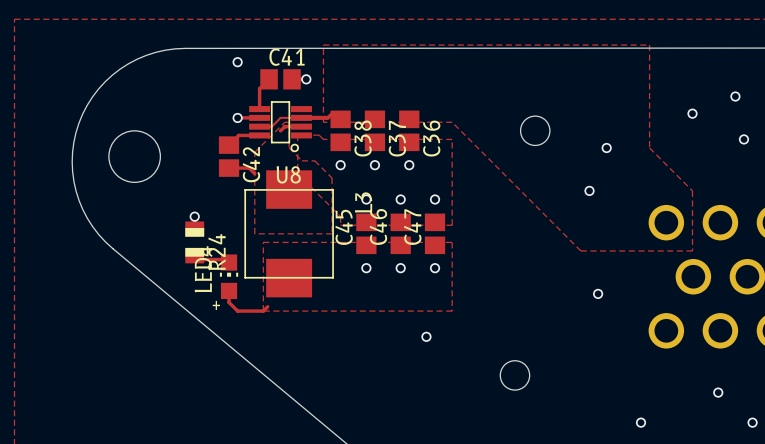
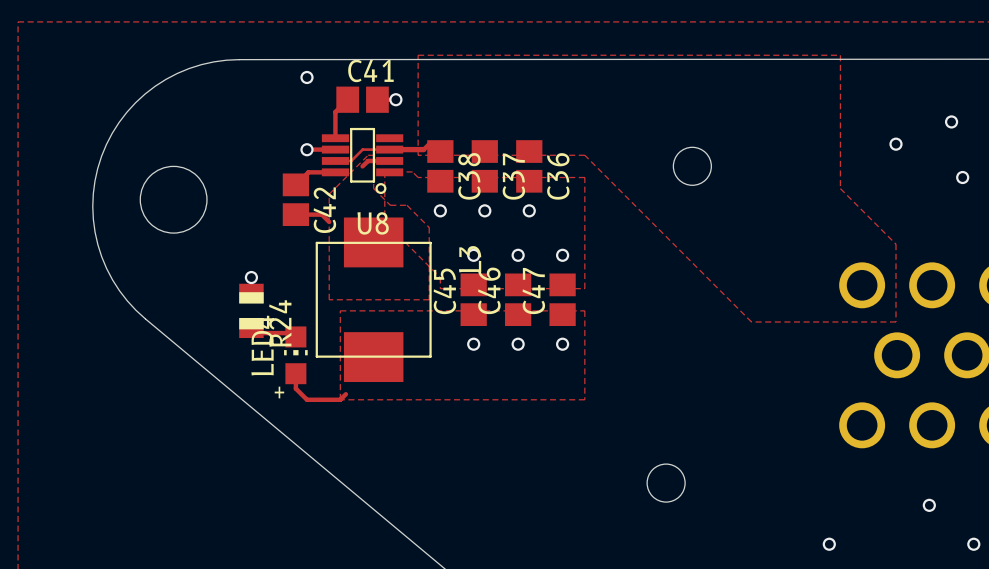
via: (606, 148) -> none
via: (589, 190) -> none
via: (598, 293) -> none
via: (426, 336) -> none

